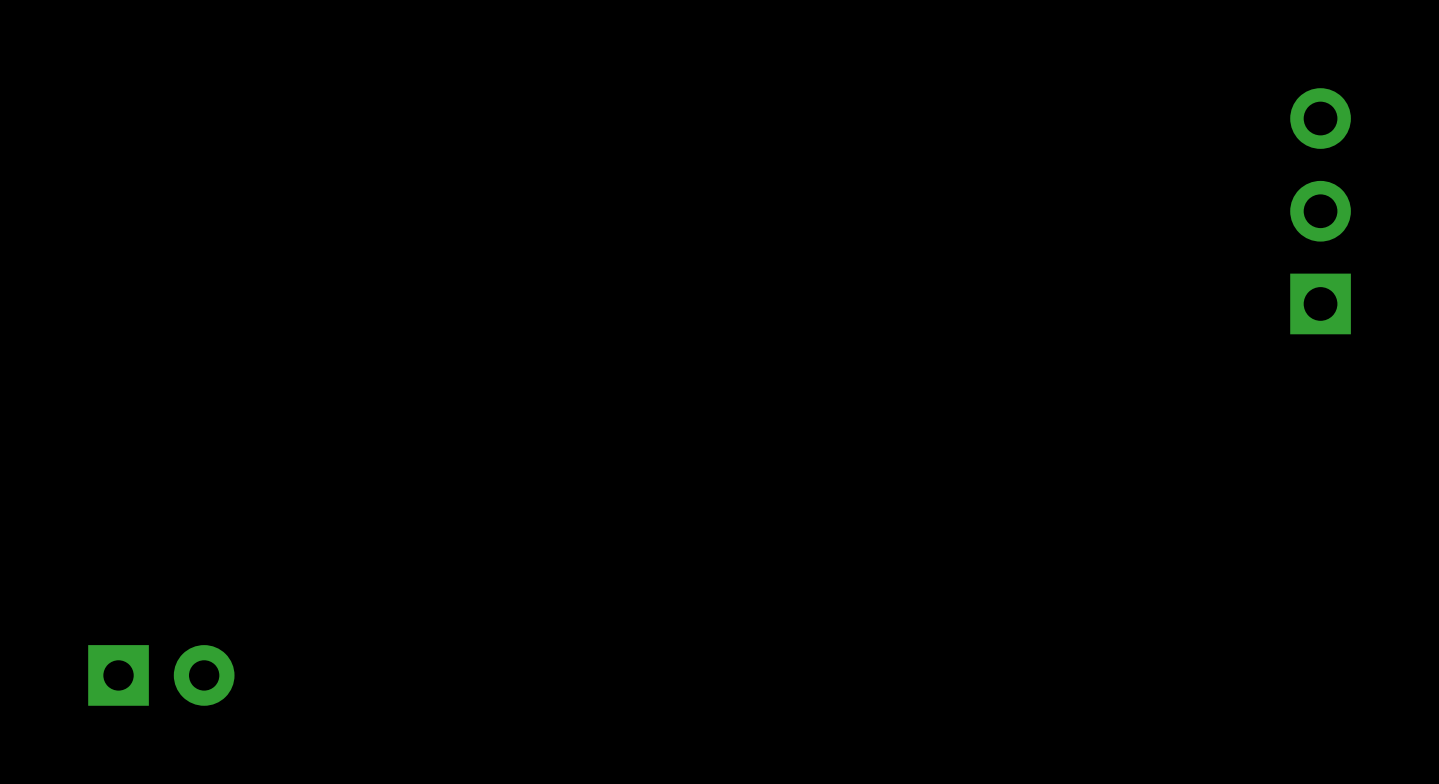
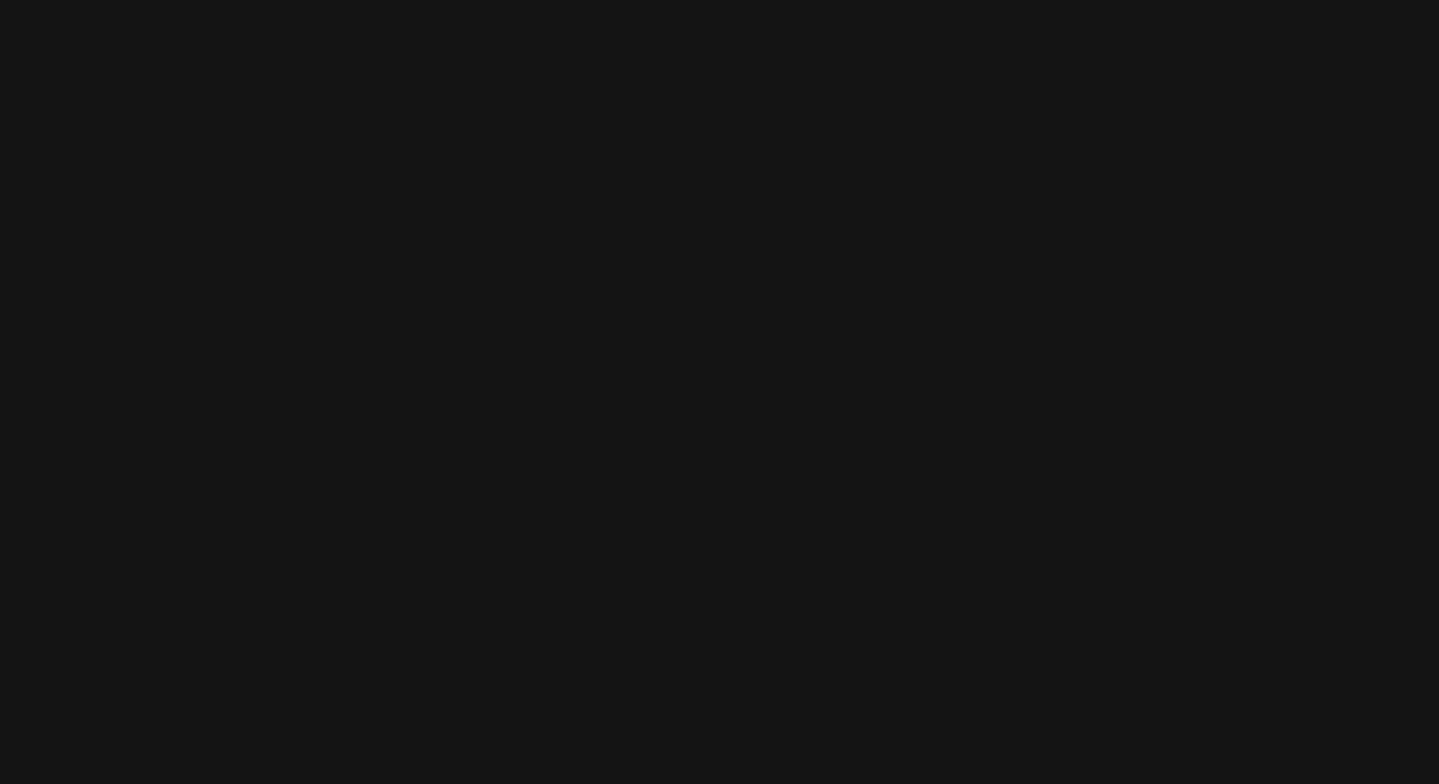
part: (1320, 211) -> none
part: (161, 675) -> none

